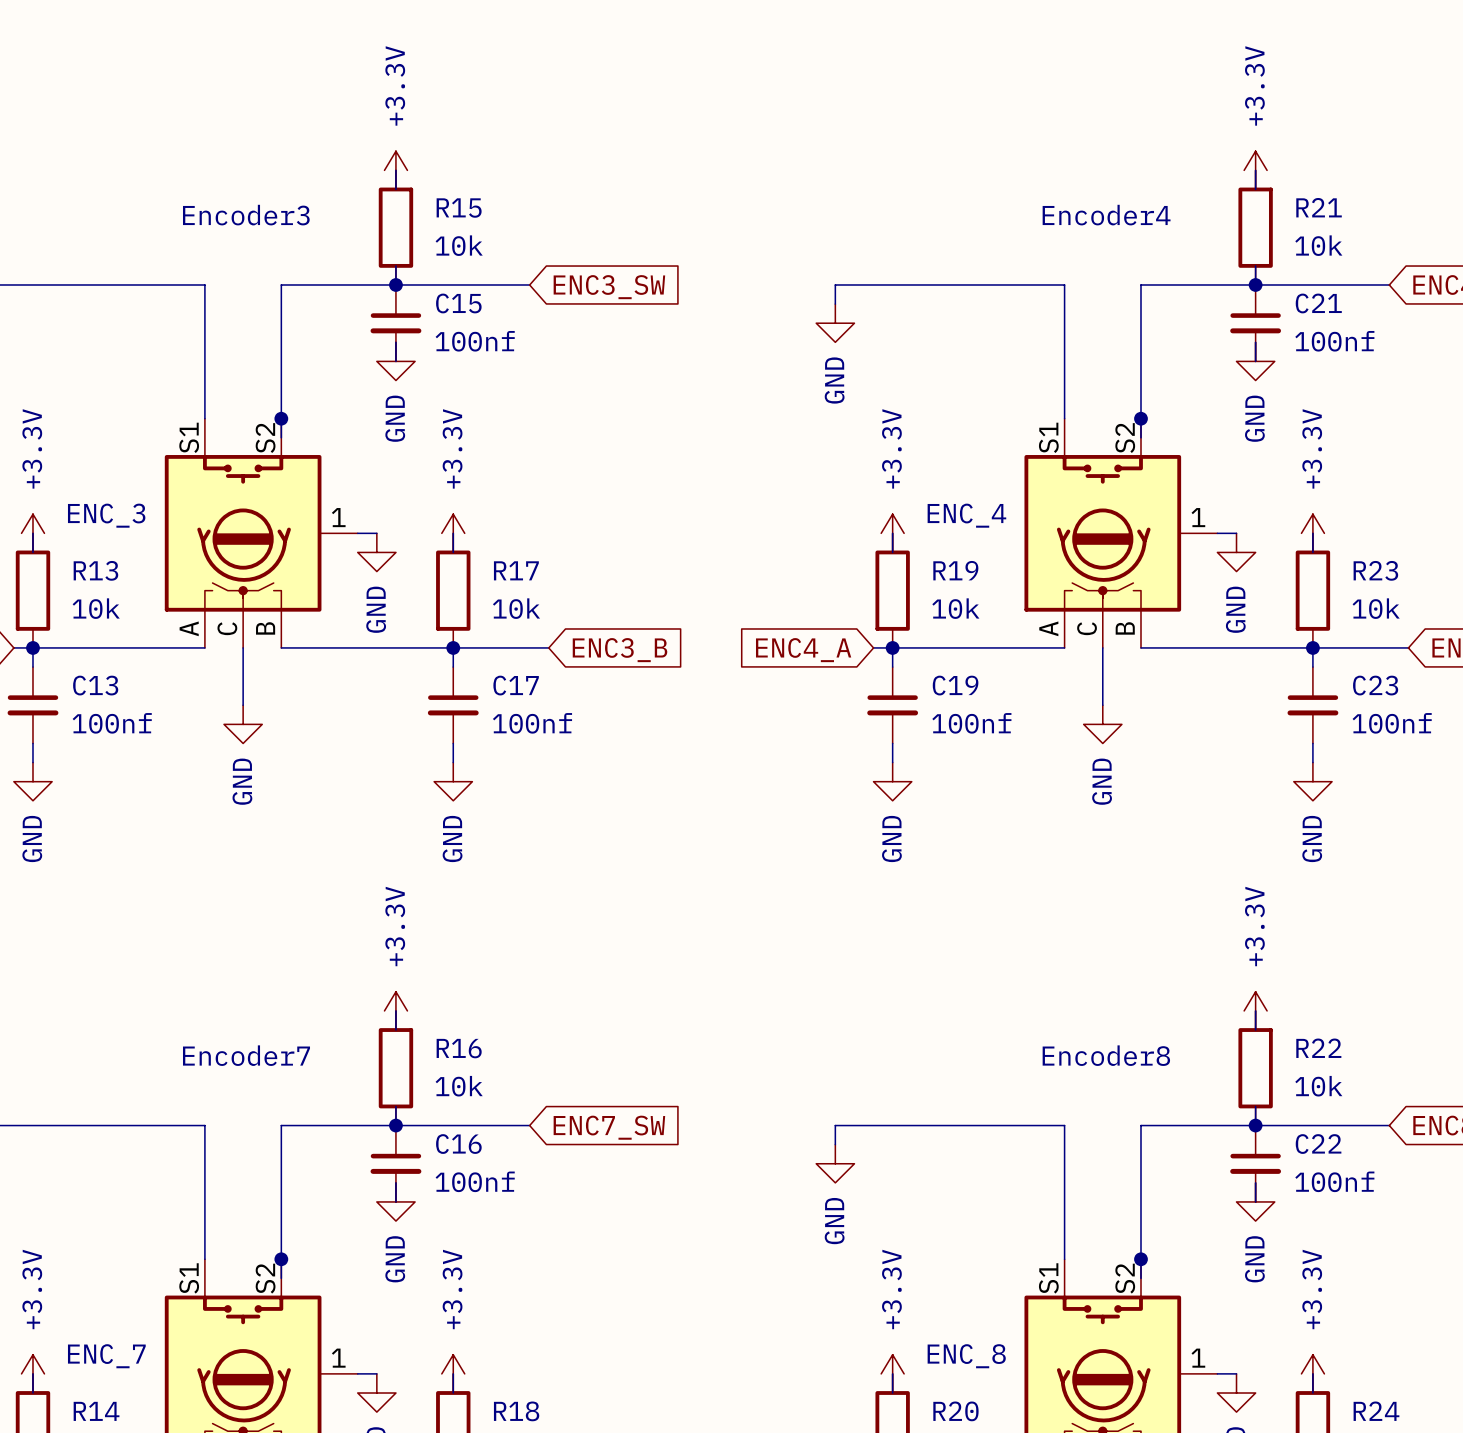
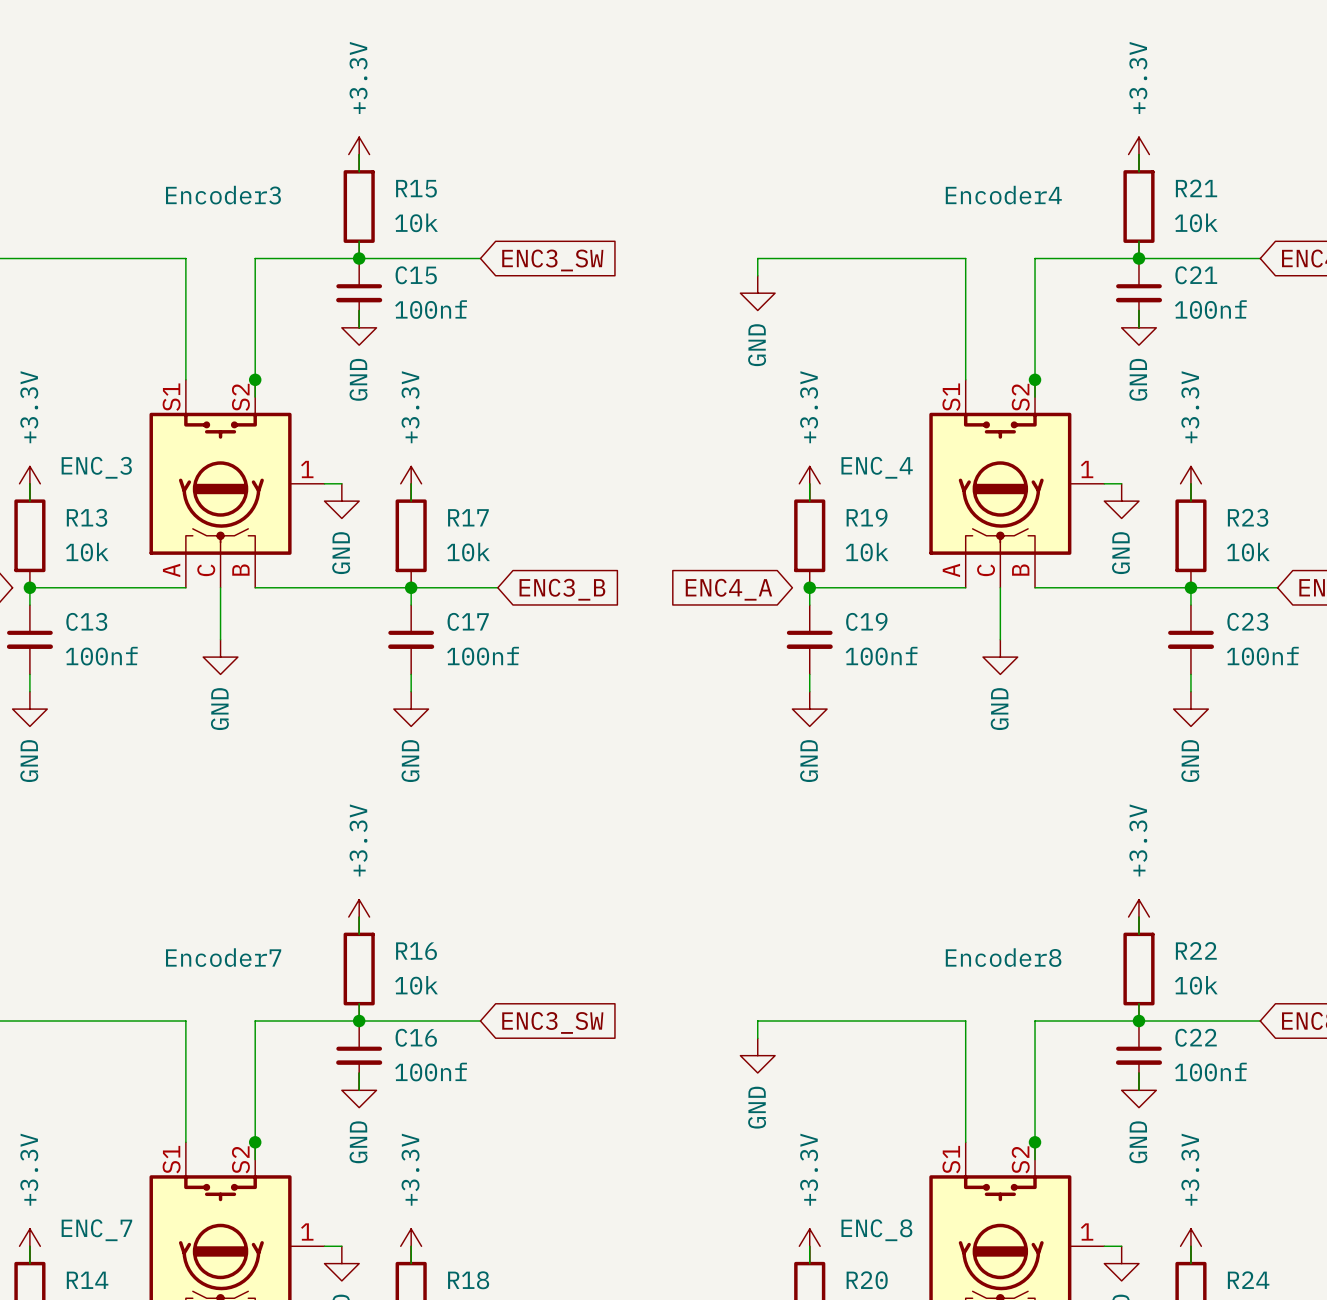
wire: (13, 647) (32, 647) -> none
wire: (873, 647) (892, 647) -> none
global label: ENC7_SW (609, 1127) -> ENC3_SW (552, 1022)

